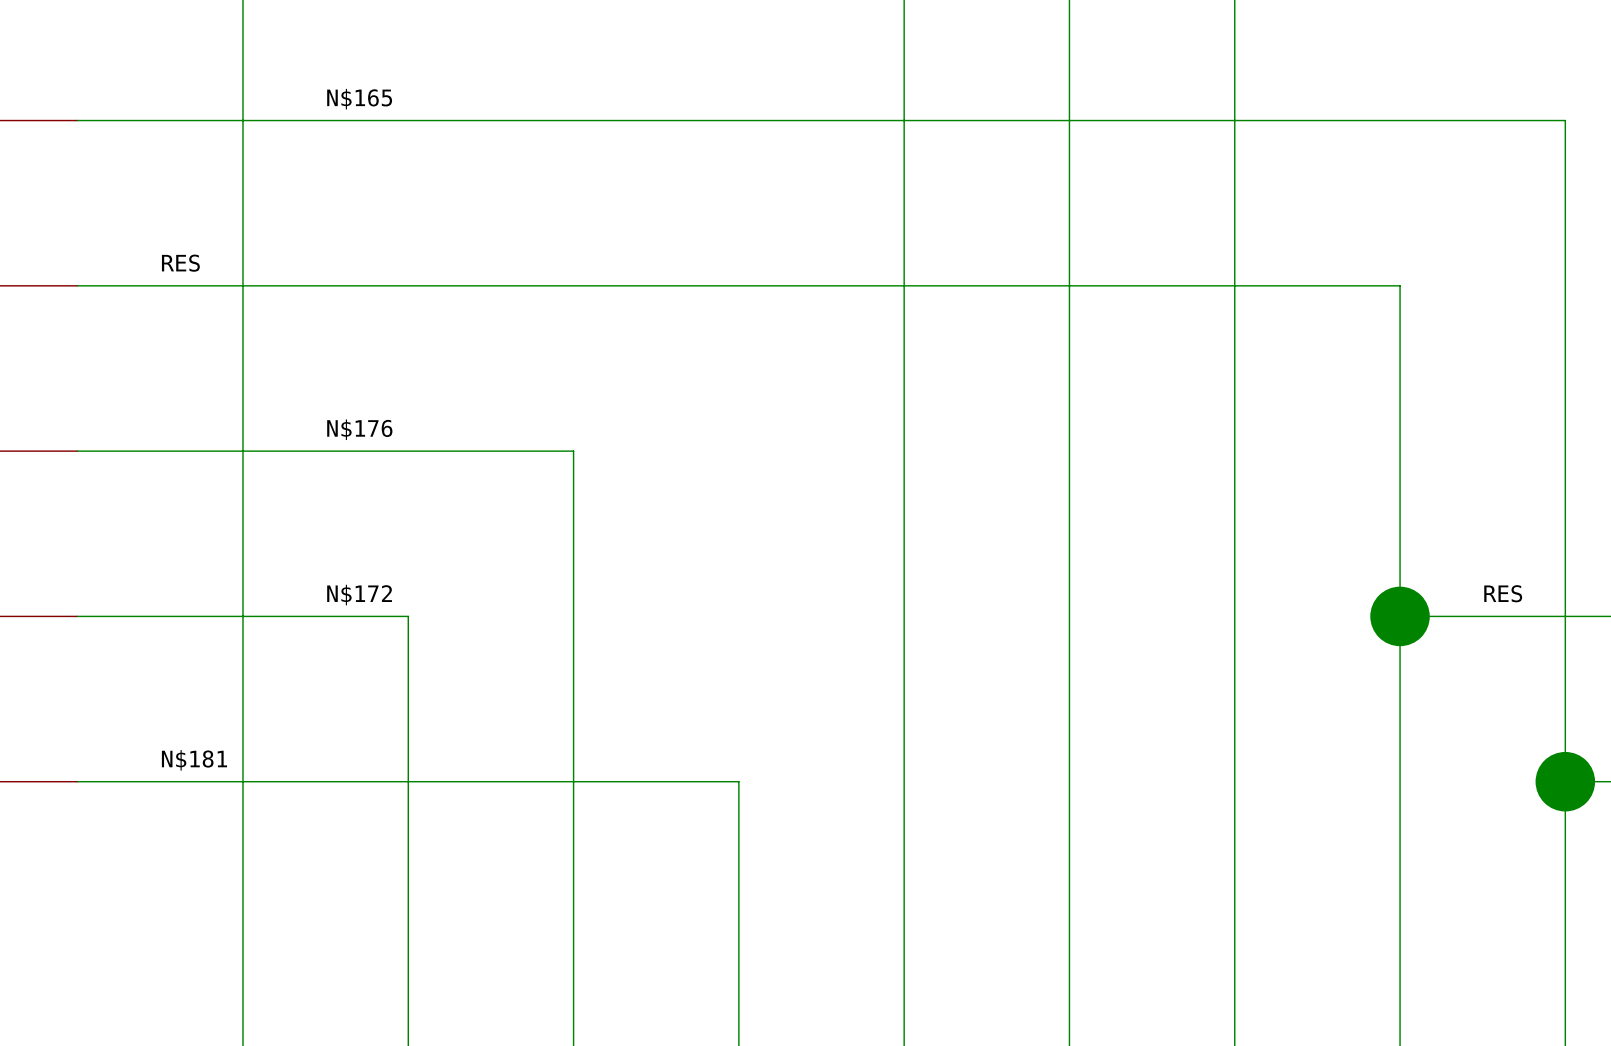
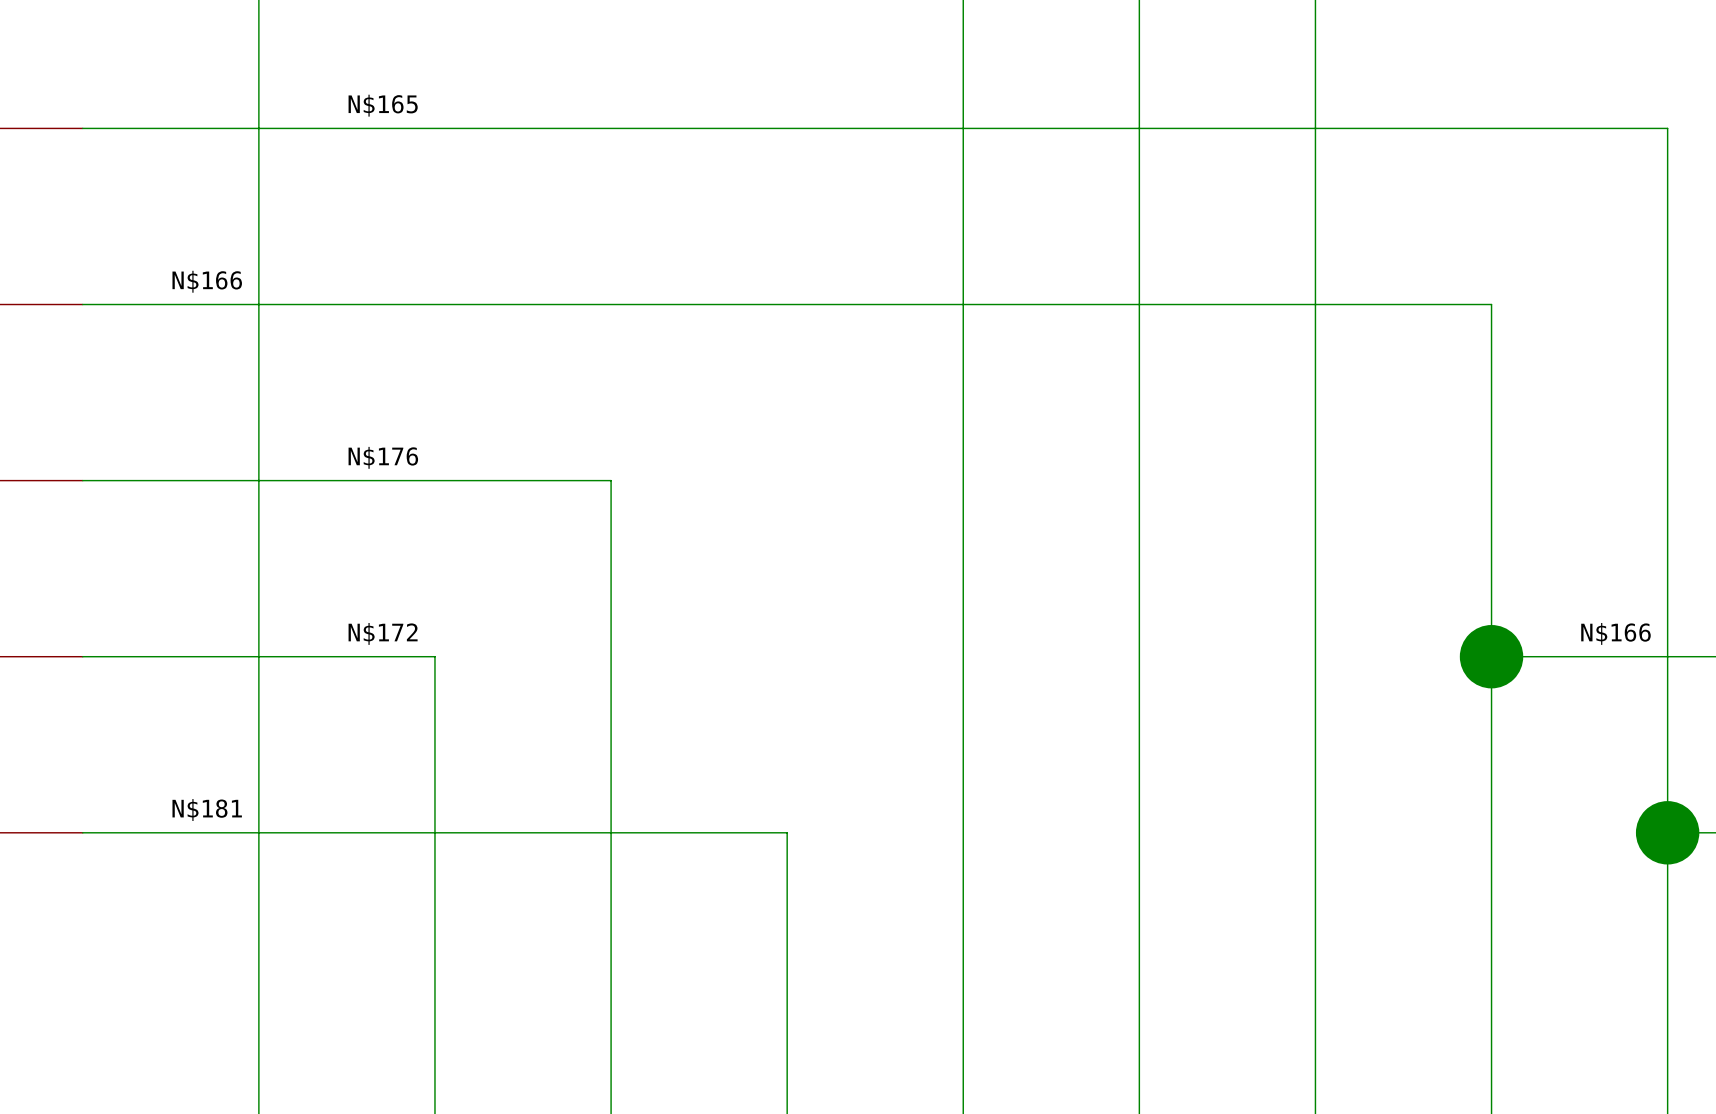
label: RES (180, 263) -> N$166 (207, 281)
label: RES (1503, 593) -> N$166 (1615, 633)

